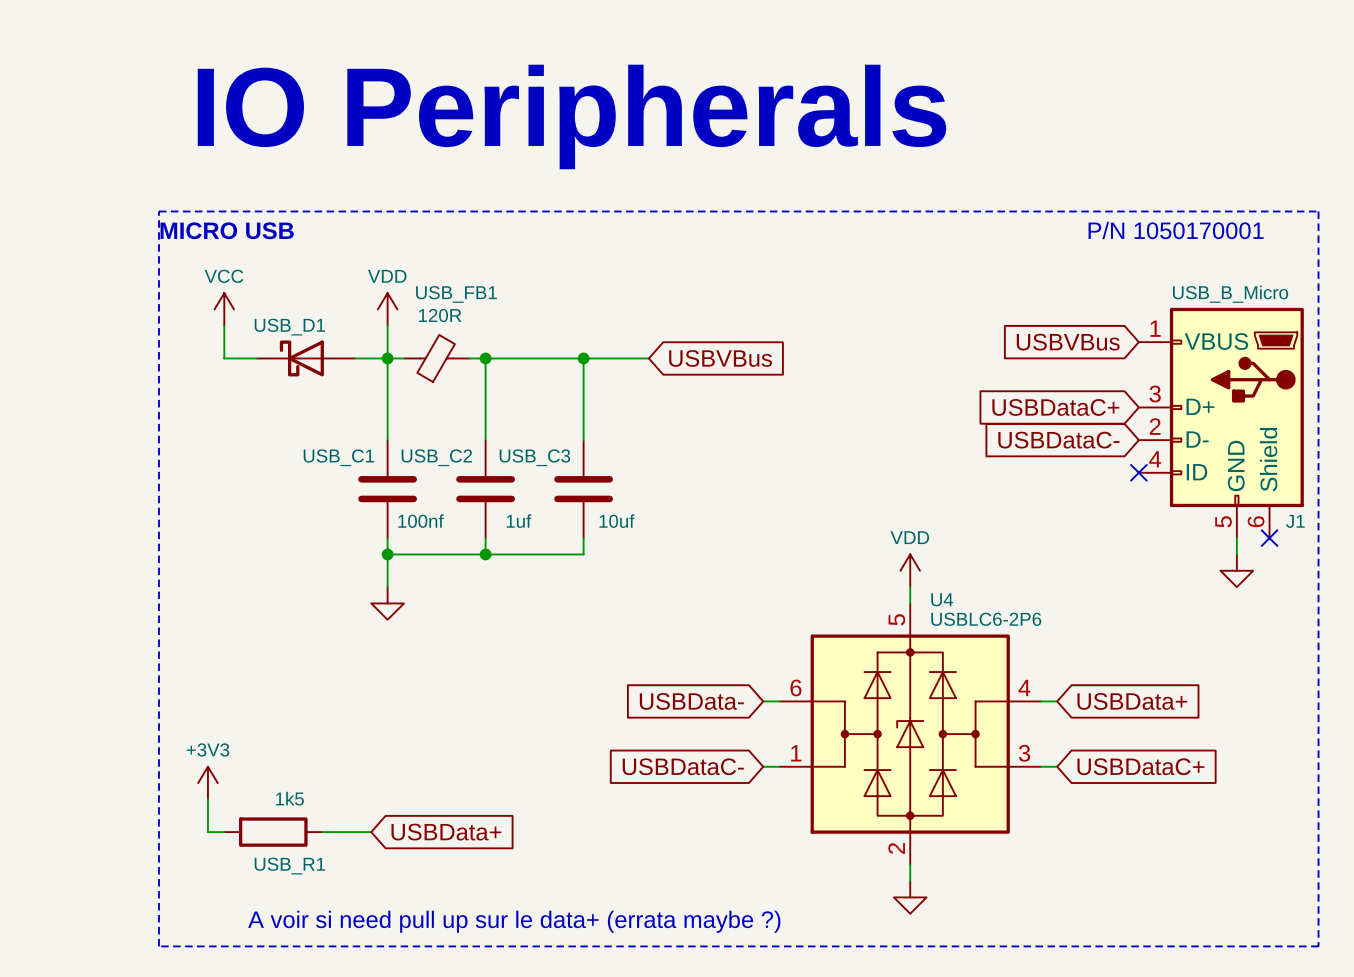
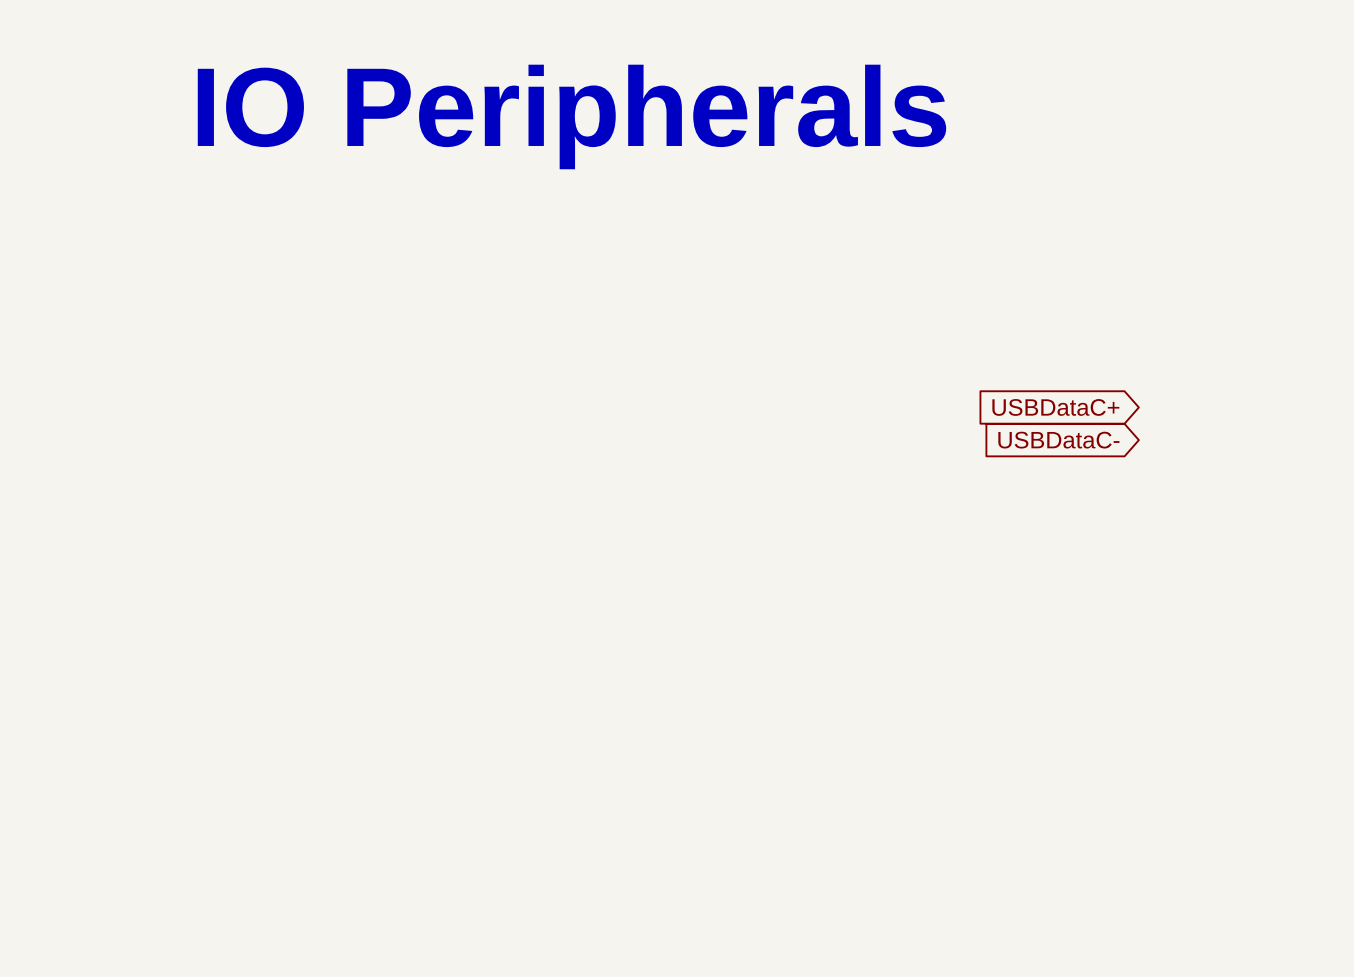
line: (158, 211) (1318, 211) (1318, 946) (158, 946) (158, 211) -> none
text: MICRO USB (227, 230) -> none
text: P/N 1050170001 (1176, 230) -> none
power symbol: VCC (224, 309) -> none
power symbol: VDD (387, 309) -> none
wire: (224, 325) (224, 358) (256, 358) -> none
wire: (387, 325) (387, 440) -> none
global label: USBVBus (1068, 342) -> none
USB_D1: (305, 358) -> none
wire: (354, 358) (403, 358) -> none
junction: (387, 358) -> none
USB_FB1: 120R (436, 358) -> none
wire: (469, 358) (648, 358) -> none
wire: (485, 358) (485, 440) -> none
junction: (485, 358) -> none
wire: (583, 358) (583, 440) -> none
junction: (583, 358) -> none
global label: USBVBus (720, 358) -> none
J1: USB_B_Micro (1221, 422) -> none
no-connect mark: (1138, 472) -> none
USB_C1: 100nf (387, 489) -> none
USB_C2: 1uf (485, 489) -> none
USB_C3: 10uf (583, 489) -> none
wire: (387, 538) (387, 587) -> none
wire: (485, 538) (485, 554) -> none
wire: (583, 538) (583, 554) (387, 554) -> none
wire: (1236, 538) (1236, 554) -> none
no-connect mark: (1269, 538) -> none
junction: (387, 554) -> none
junction: (485, 554) -> none
power symbol: VDD (910, 570) -> none
power symbol: (1236, 570) -> none
wire: (910, 587) (910, 603) -> none
power symbol: (387, 603) -> none
global label: USBData- (691, 701) -> none
wire: (763, 701) (779, 701) -> none
wire: (1040, 701) (1057, 701) -> none
global label: USBData+ (1132, 701) -> none
U4: USBLC6-2P6 (910, 734) -> none
global label: USBDataC- (683, 766) -> none
wire: (763, 766) (779, 766) -> none
wire: (1040, 766) (1057, 766) -> none
global label: USBDataC+ (1140, 766) -> none
power symbol: +3V3 (207, 783) -> none
wire: (207, 799) (207, 832) (224, 832) -> none
USB_R1: 1k5 (273, 832) -> none
wire: (322, 832) (371, 832) -> none
global label: USBData+ (446, 832) -> none
wire: (910, 864) (910, 881) -> none
power symbol: (910, 897) -> none
text: A voir si need pull up sur le data+ (errata maybe ?) (514, 921) -> none

